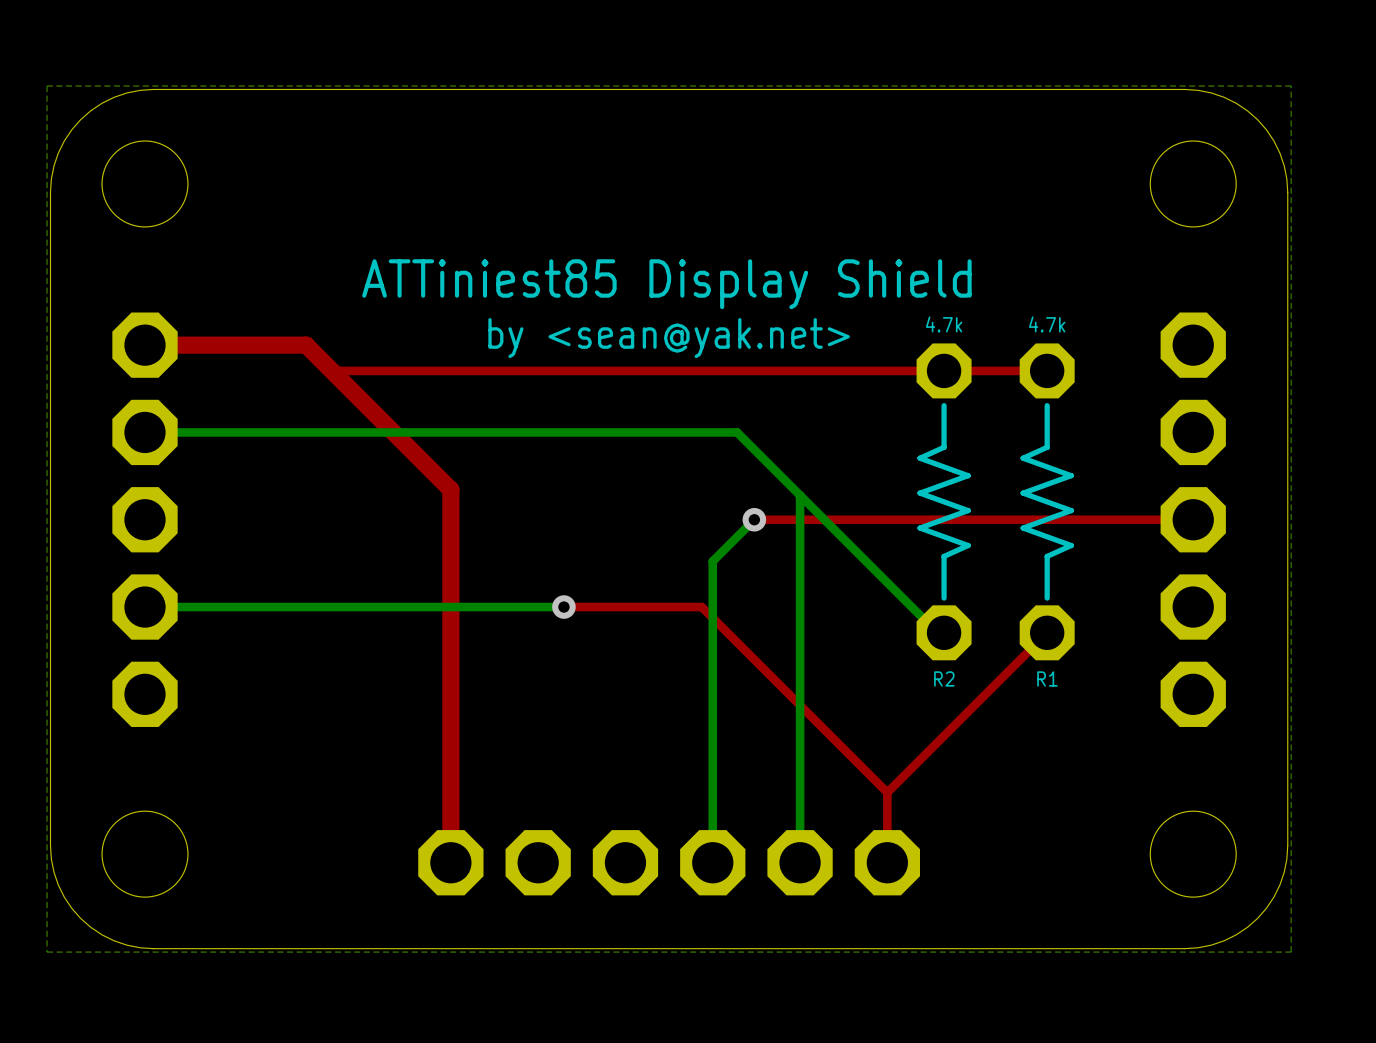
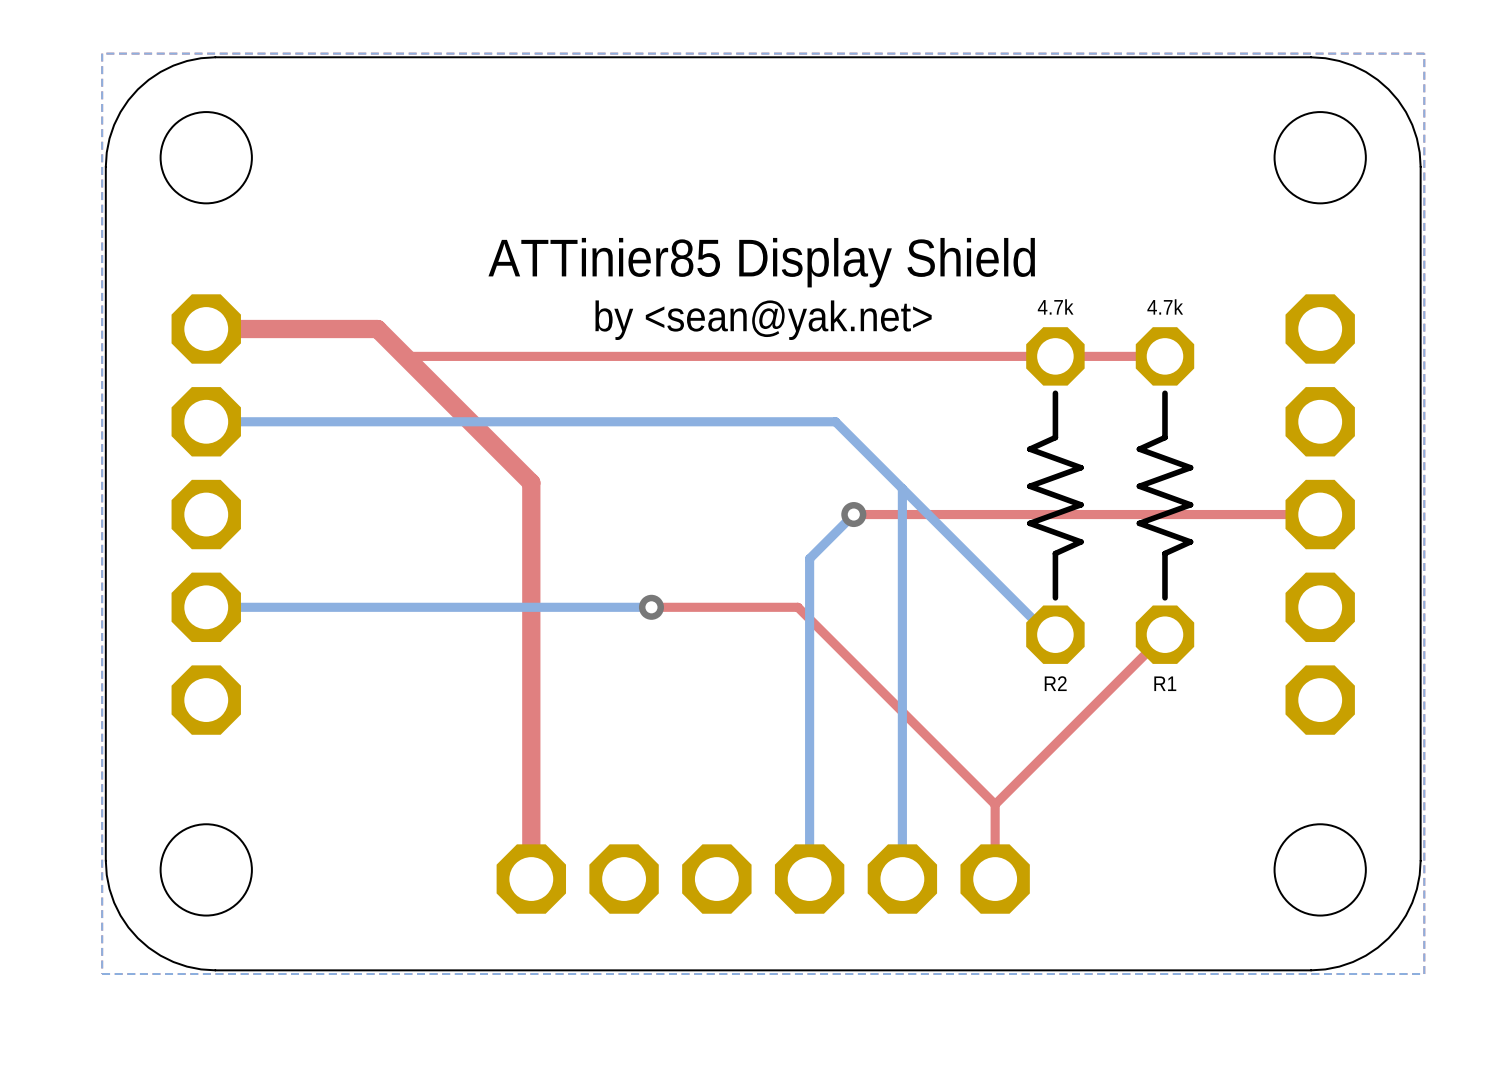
text: ATTiniest85 Display Shield (666, 284) -> ATTinier85 Display Shield (761, 262)

